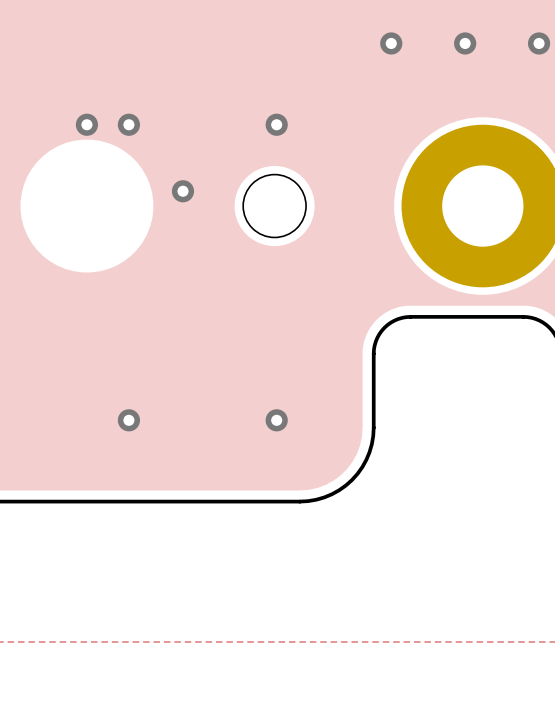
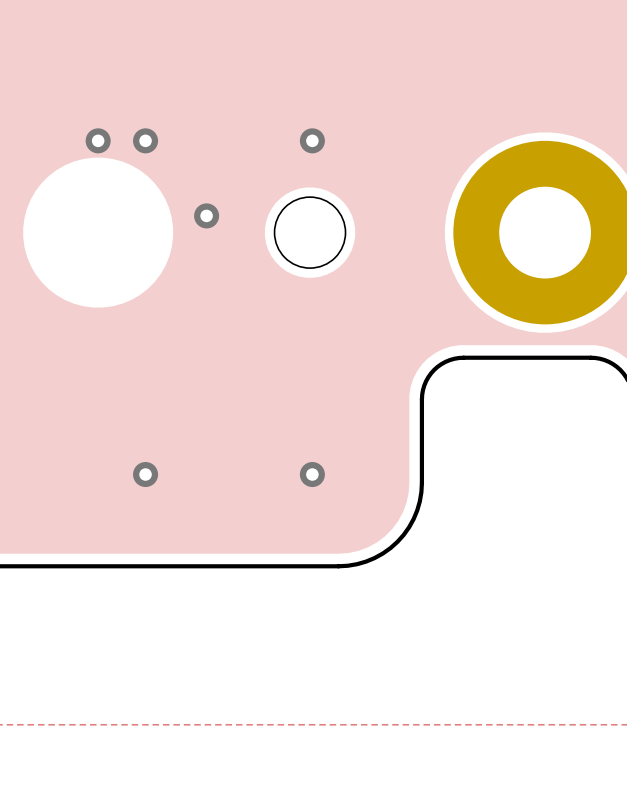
via: (391, 43) -> none
via: (465, 43) -> none
via: (539, 43) -> none

